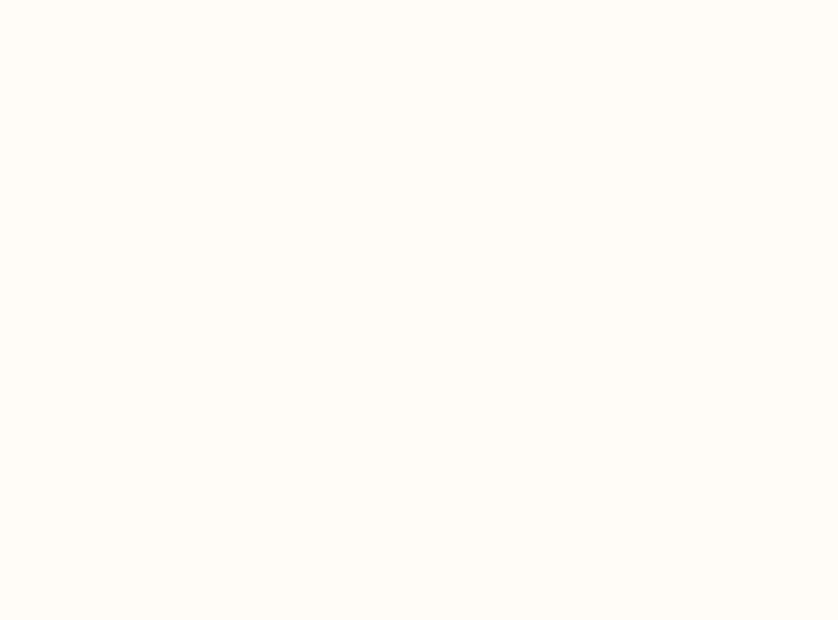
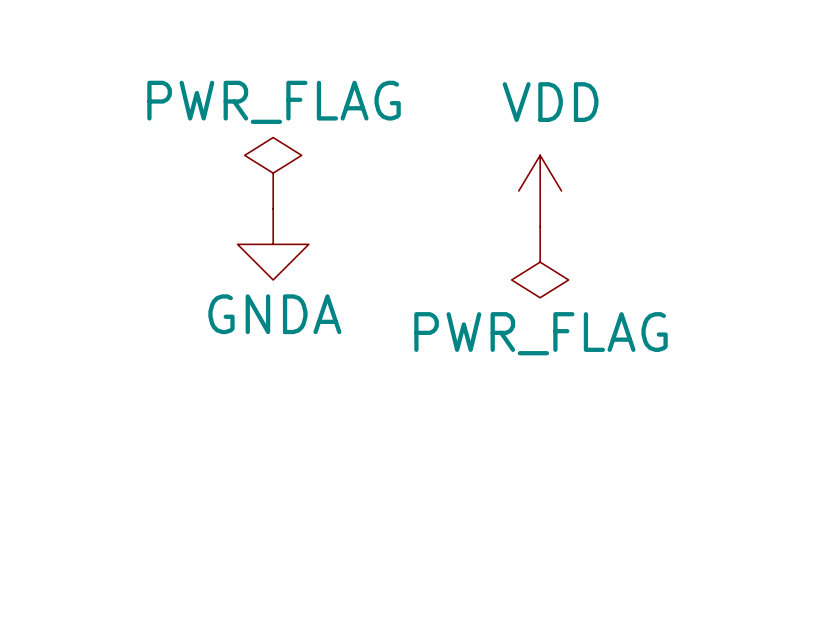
power symbol: none -> PWR_FLAG (273, 173)
power symbol: none -> VDD (540, 190)
power symbol: none -> GNDA (273, 244)
power symbol: none -> PWR_FLAG (540, 262)

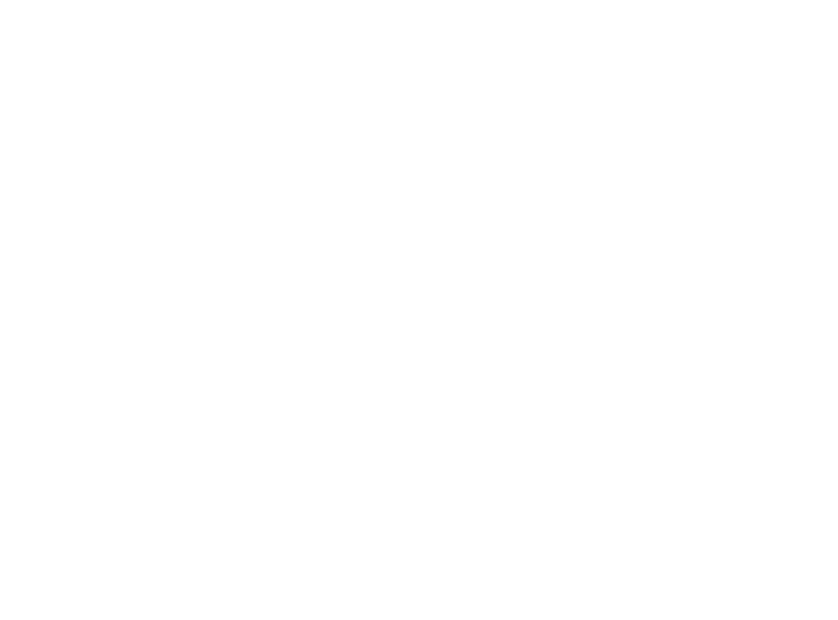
power symbol: PWR_FLAG (273, 173) -> none
power symbol: VDD (540, 190) -> none
power symbol: GNDA (273, 244) -> none
power symbol: PWR_FLAG (540, 262) -> none

